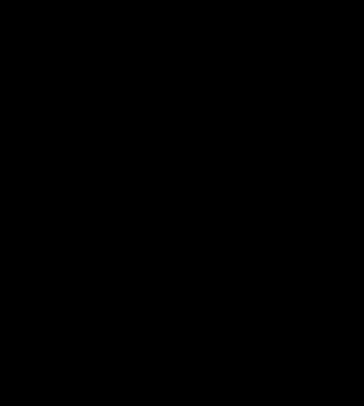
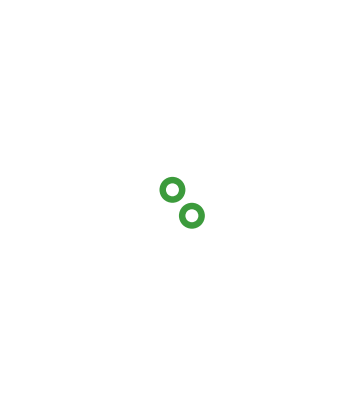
via: none -> (172, 189)
via: none -> (191, 215)

